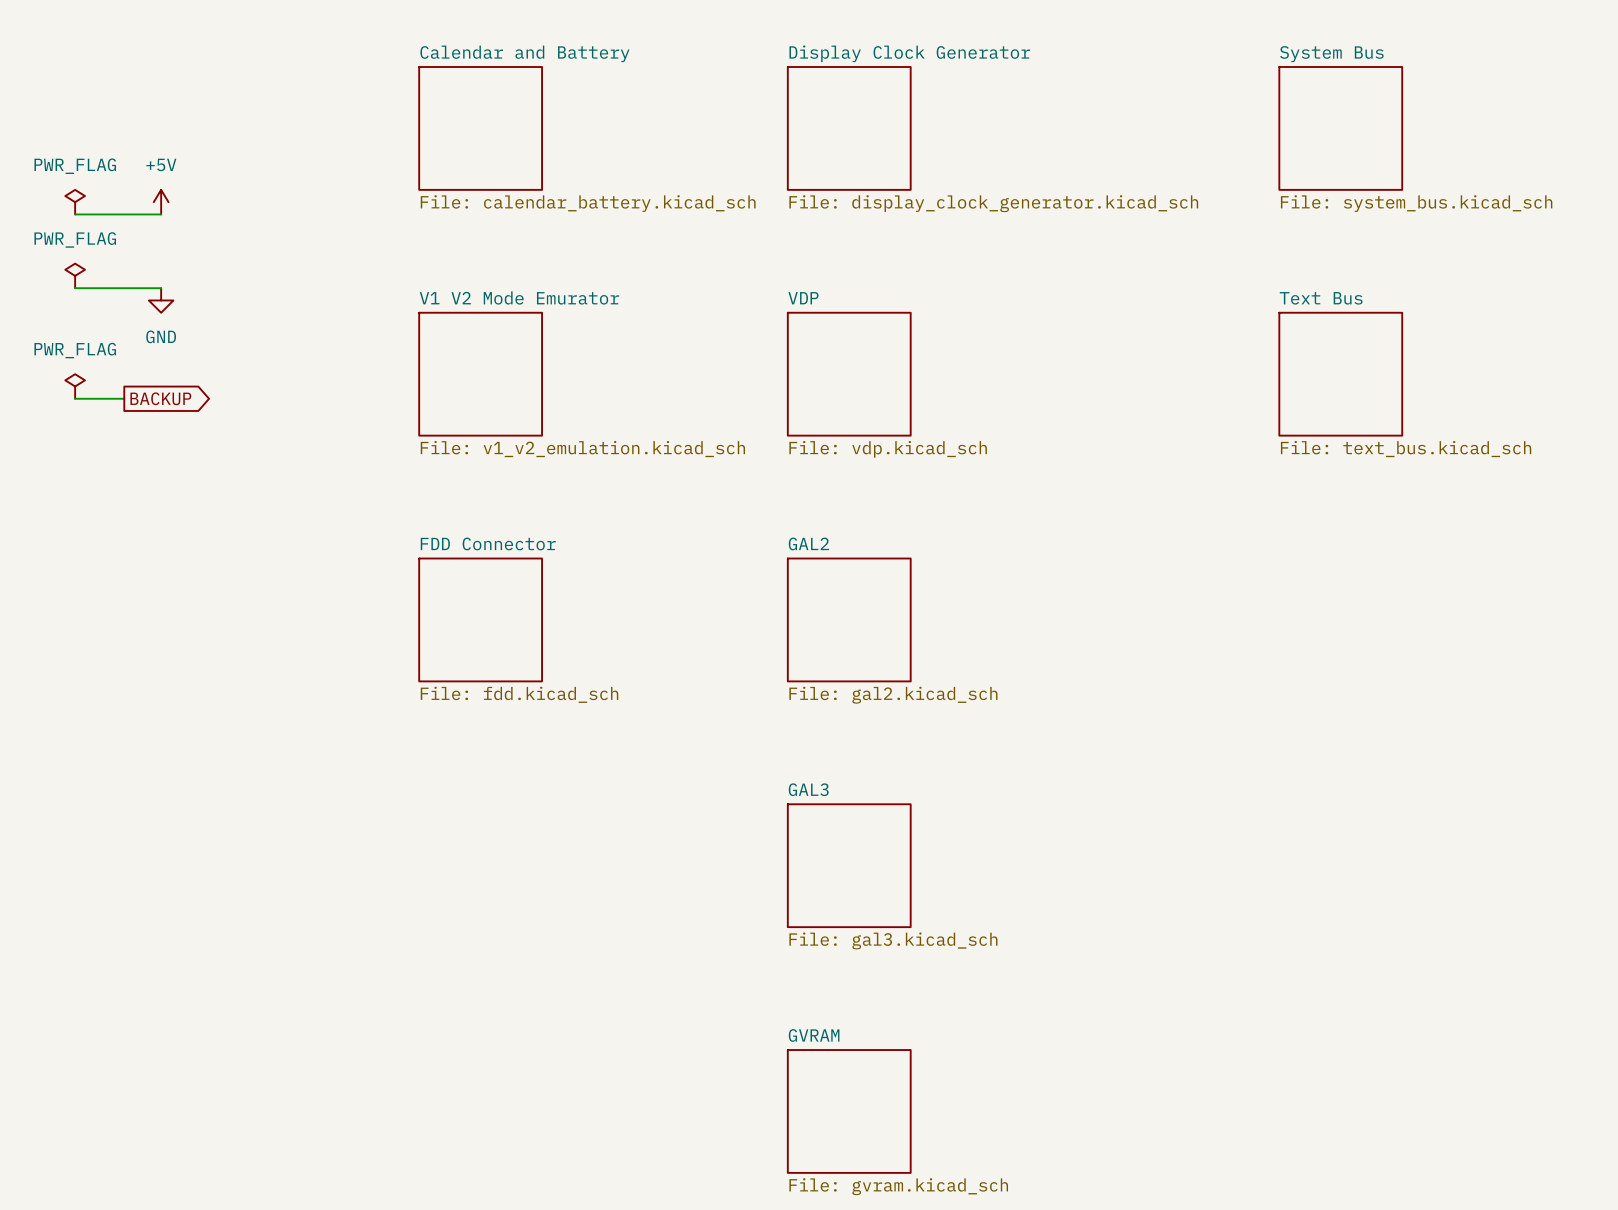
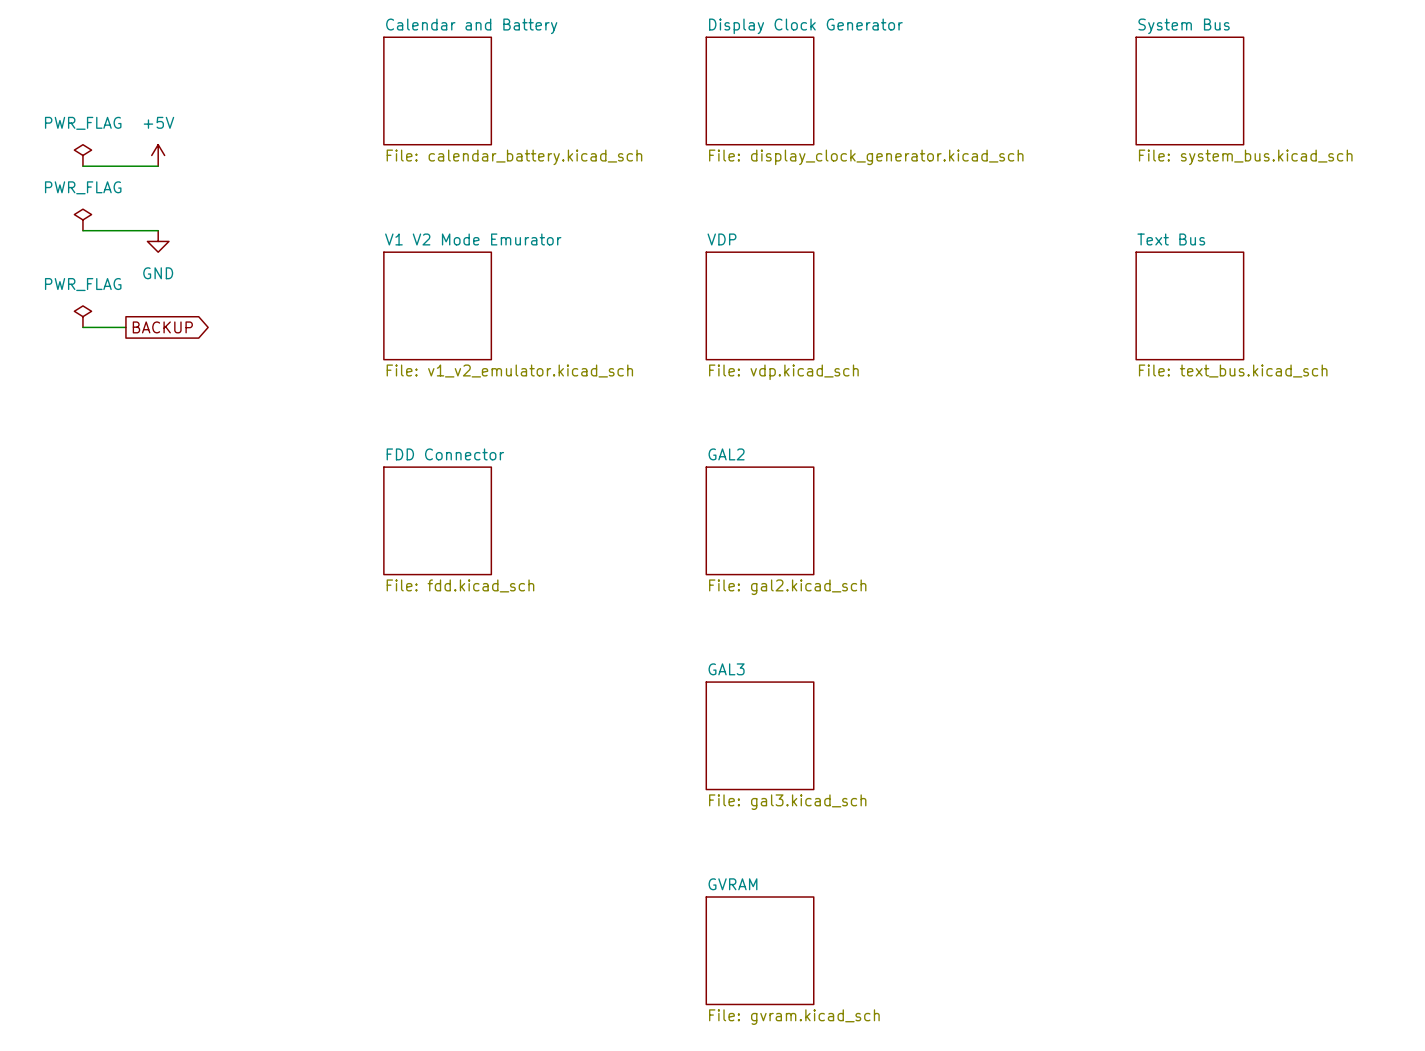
sheet V1 V2 Mode Emurator value: File: v1_v2_emulation.kicad_sch (582, 449) -> File: v1_v2_emulator.kicad_sch (509, 371)

